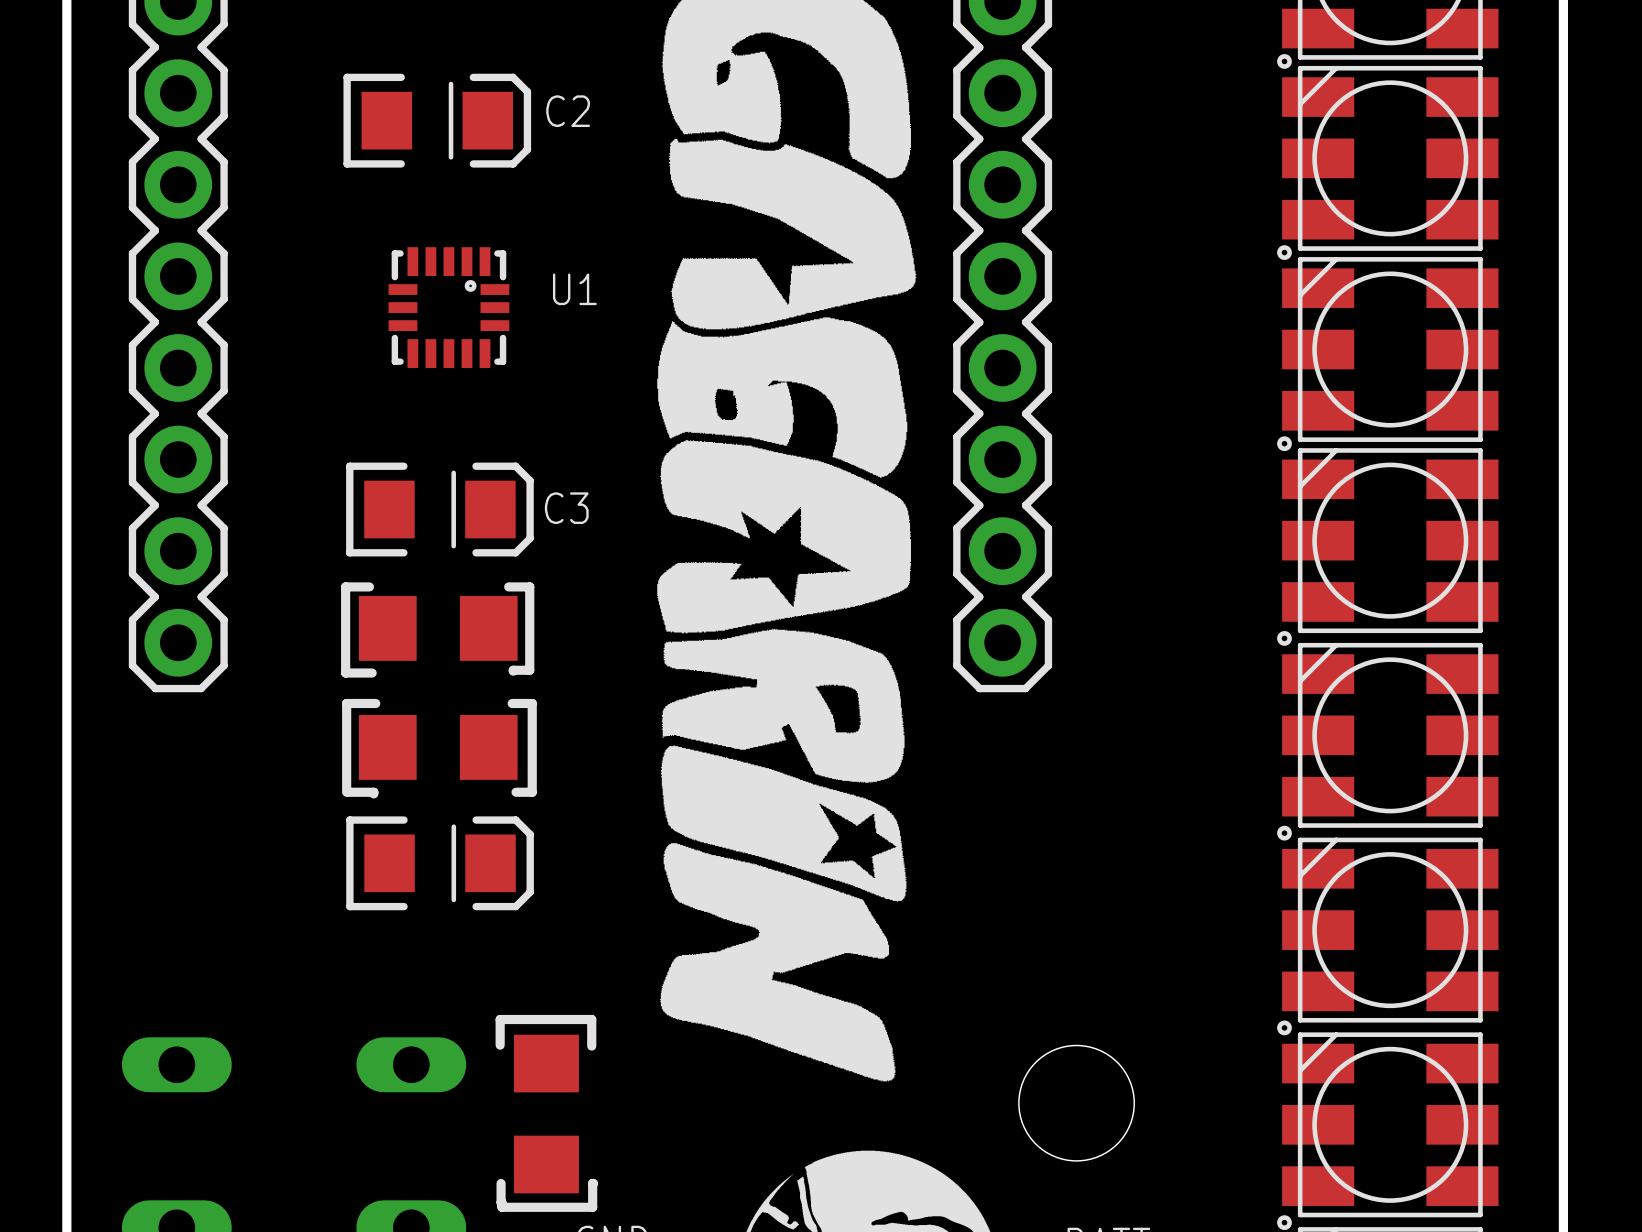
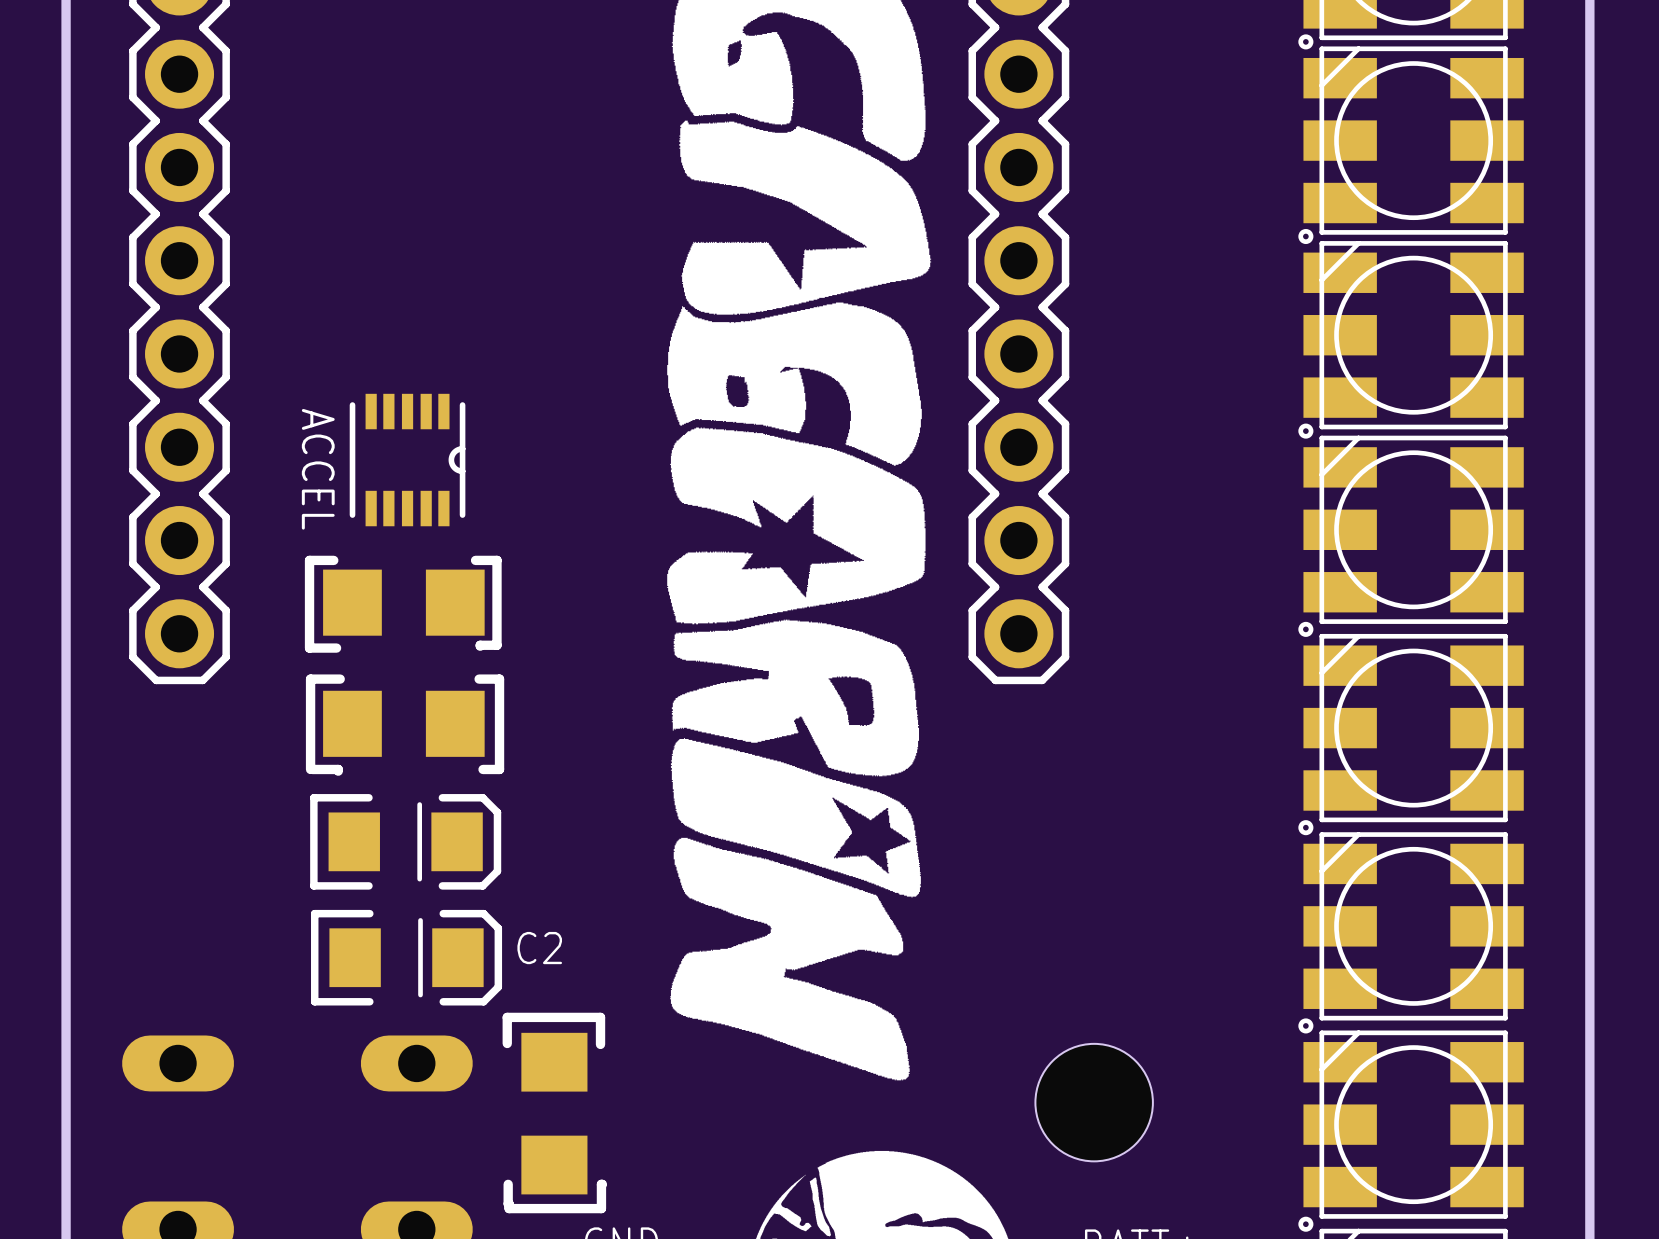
C2 position: (437, 120) -> (406, 957)
U1: (448, 307) -> none
ACCEL: none -> (407, 460)
C3: (439, 509) -> none
line: (369, 586) (345, 586) (345, 673) (372, 673) -> (333, 560) (309, 560) (309, 648) (336, 648)
line: (508, 586) (529, 586) (529, 670) (513, 671) -> (475, 560) (496, 560) (496, 645) (480, 646)
part position: (438, 628) -> (403, 602)
line: (375, 703) (346, 703) (346, 792) -> (340, 679) (310, 679) (310, 769)
line: (512, 703) (532, 703) (532, 792) (516, 792) -> (479, 679) (499, 679) (499, 769) (483, 769)
part position: (438, 747) -> (403, 723)
line: (348, 792) (373, 792) (373, 793) -> (312, 769) (338, 769) (338, 771)
part position: (440, 863) -> (405, 841)

